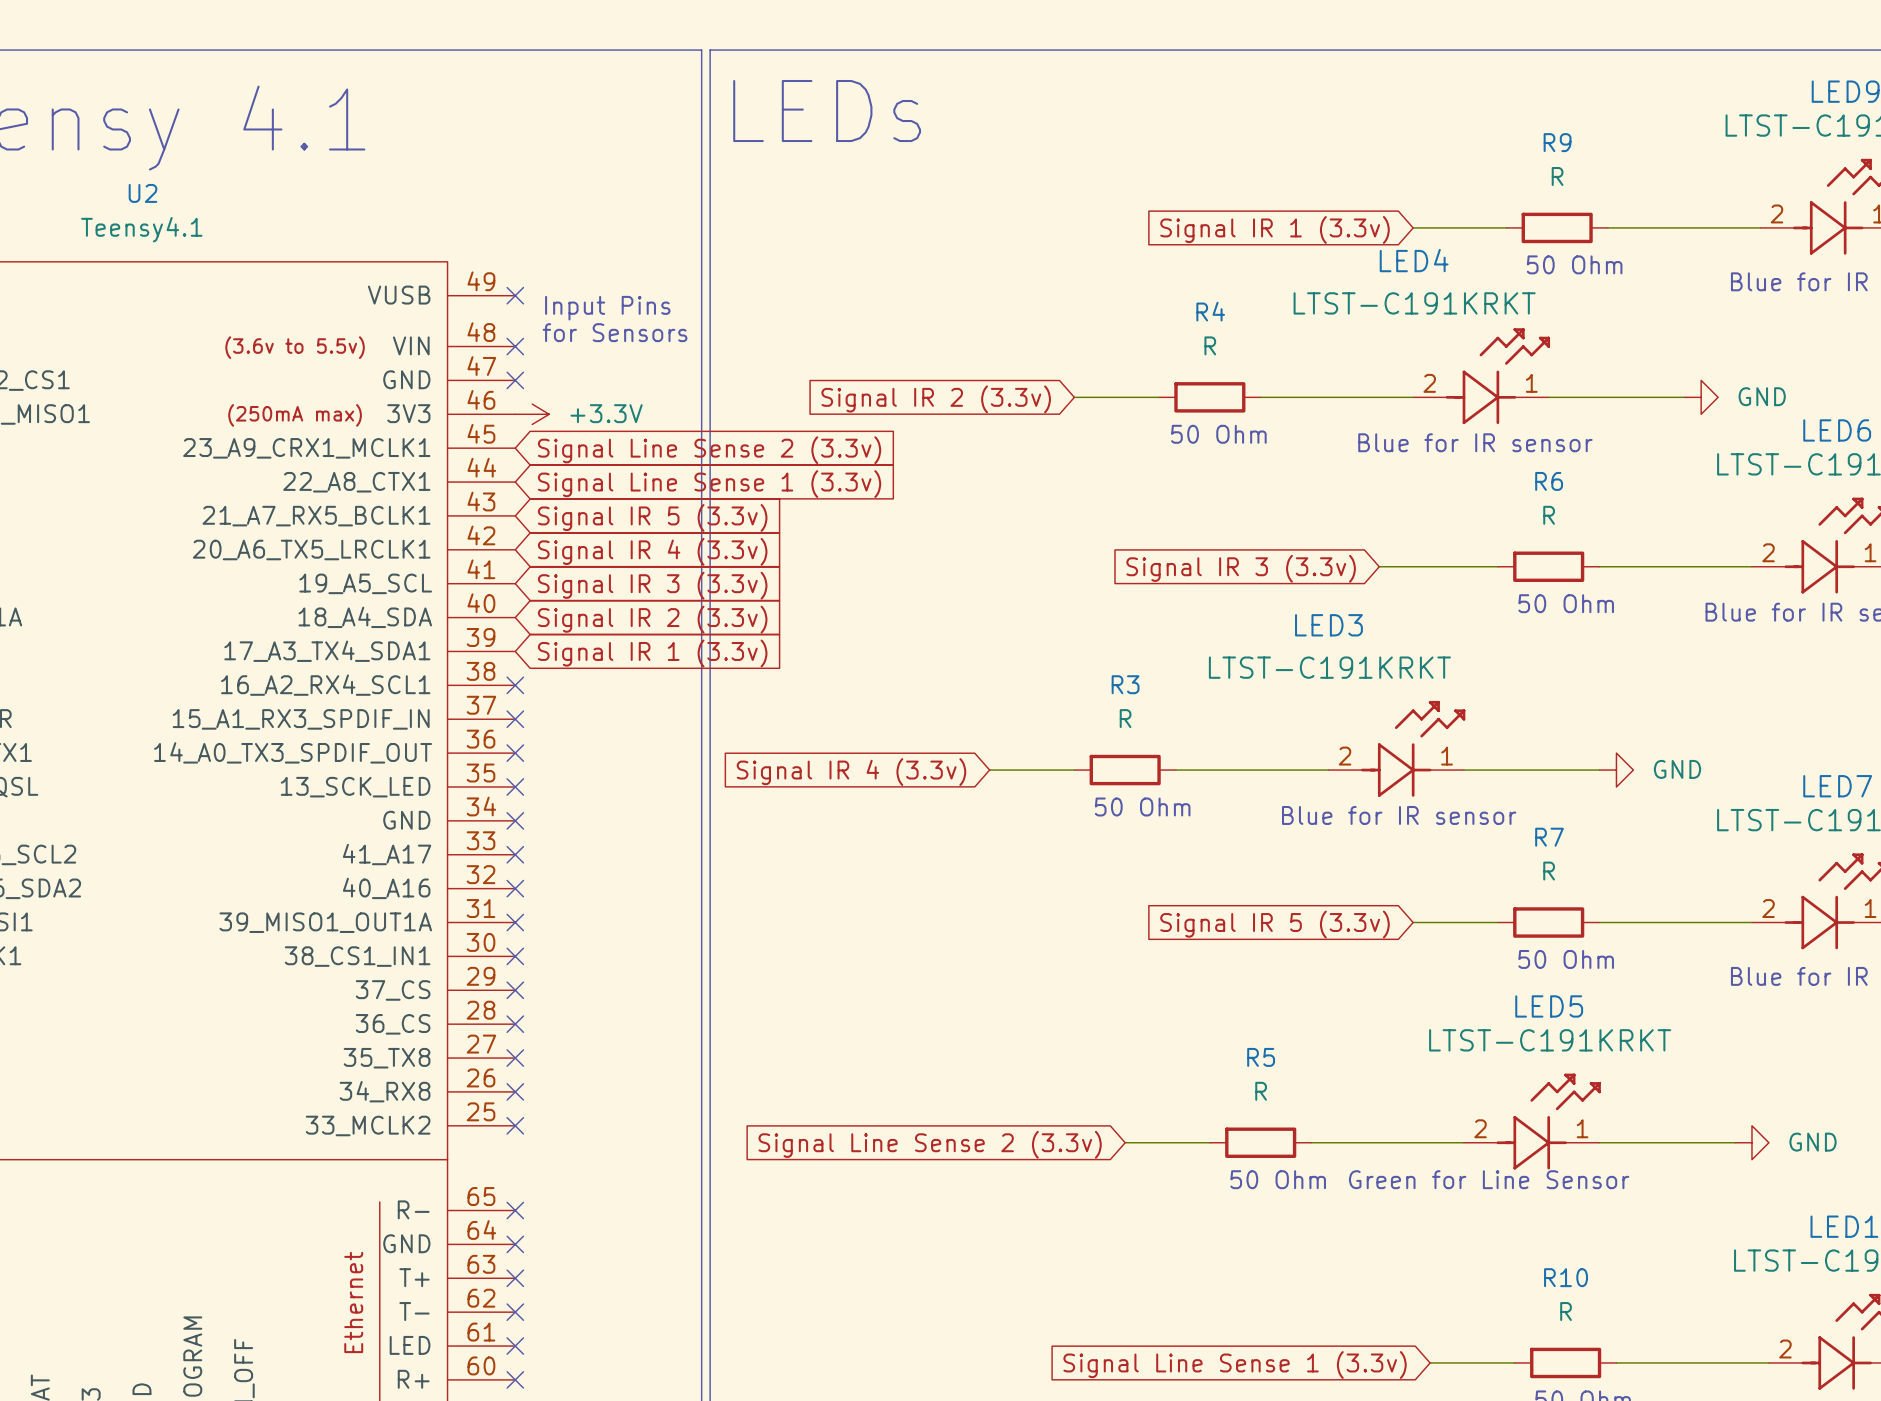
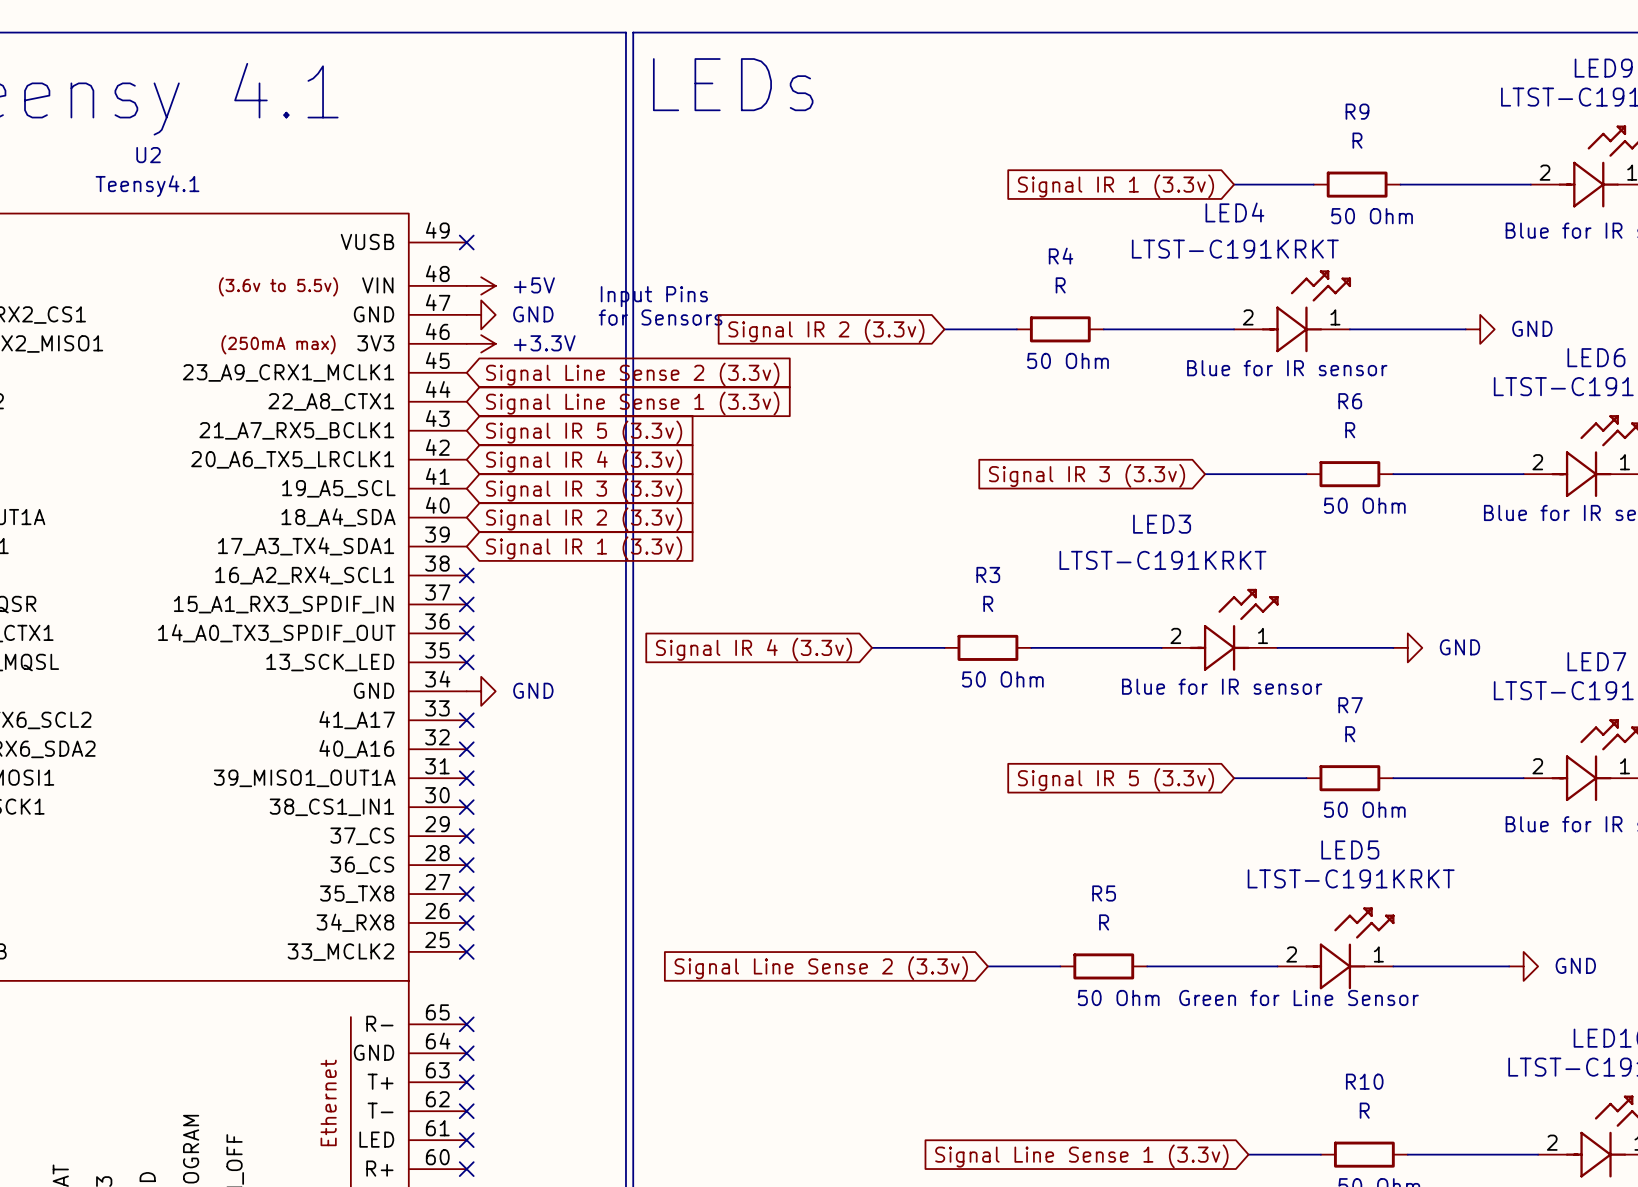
text position: Input Pins (607, 308) -> Input Pins (654, 296)
text position: for Sensors (615, 332) -> for Sensors (660, 317)
no-connect mark: (515, 346) -> none
power symbol: none -> +5V (481, 285)
no-connect mark: (515, 380) -> none
power symbol: none -> GND (481, 314)
no-connect mark: (515, 820) -> none
power symbol: none -> GND (481, 691)

